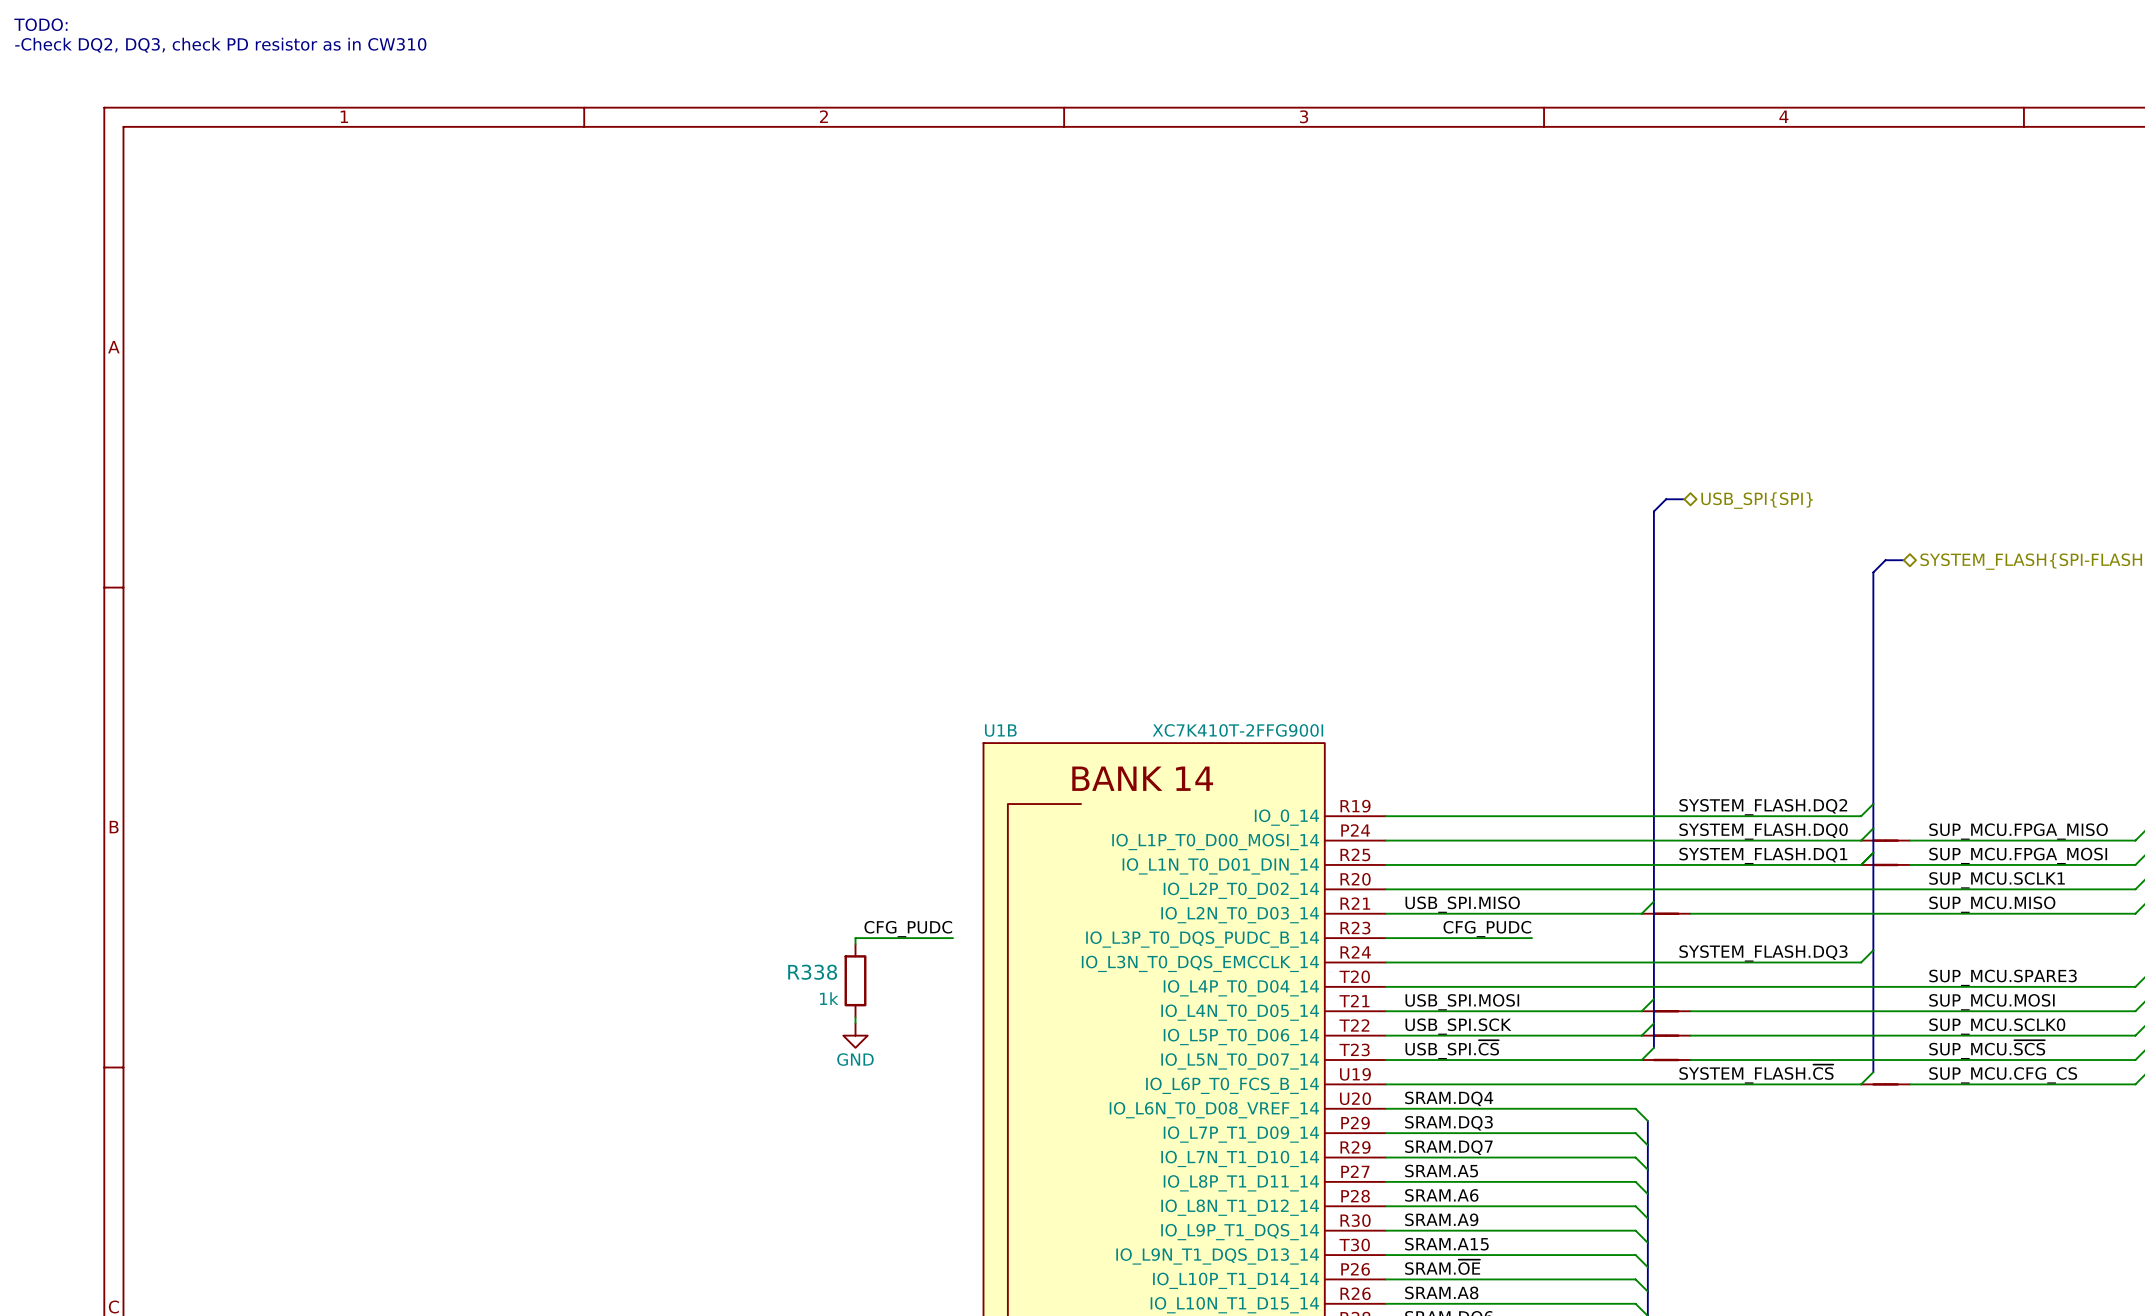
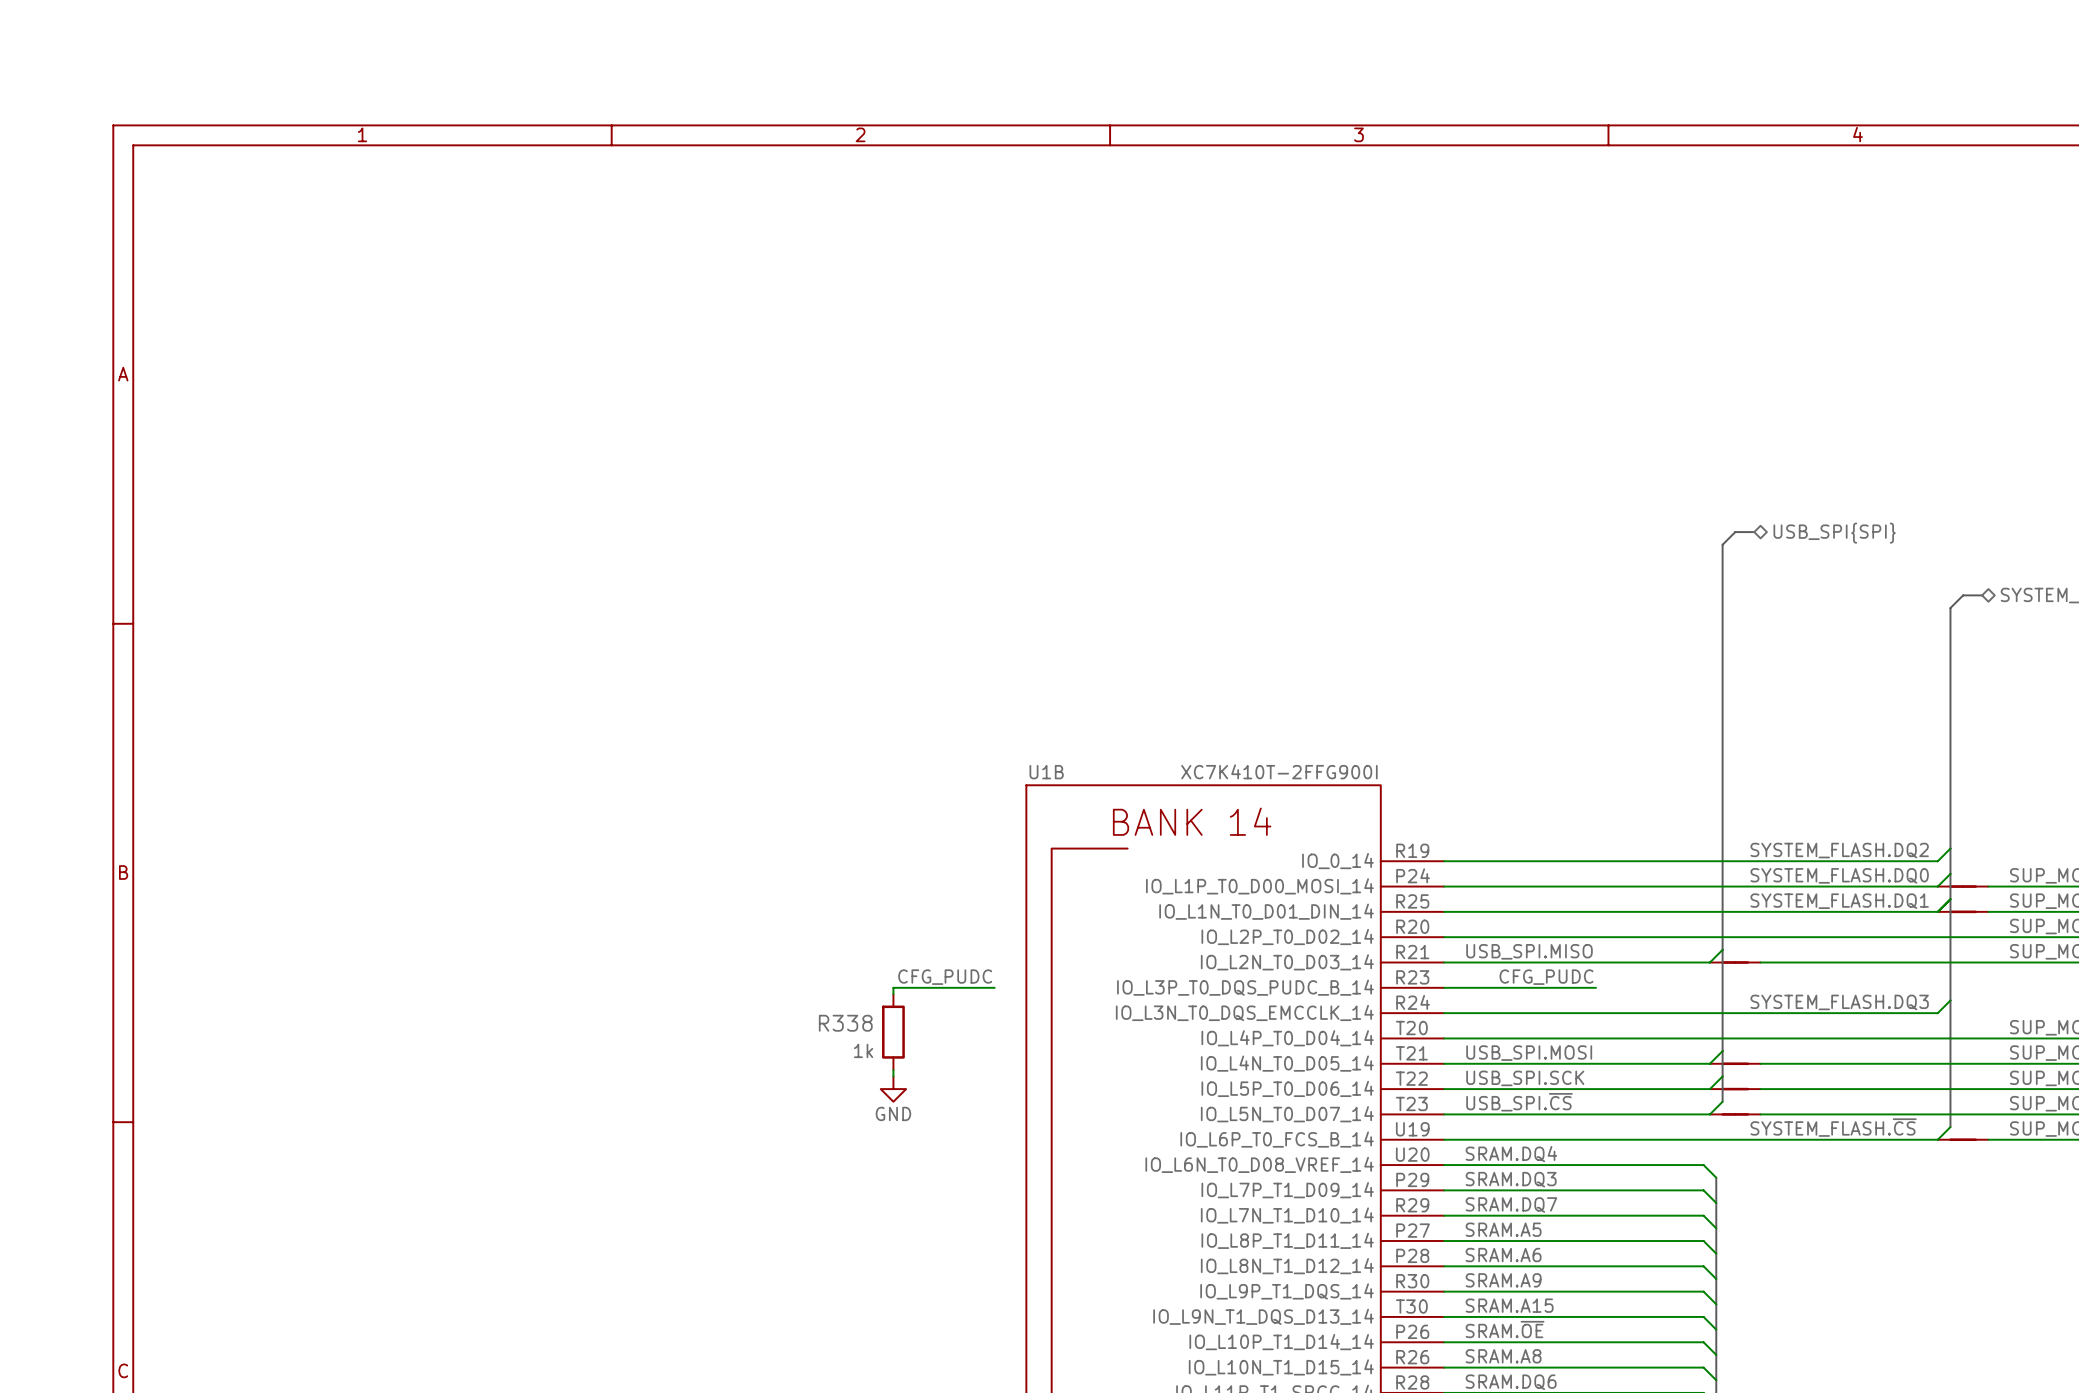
text: TODO: (40, 24) -> none
text: -Check DQ2, DQ3, check PD resistor as in CW310 (220, 45) -> none

